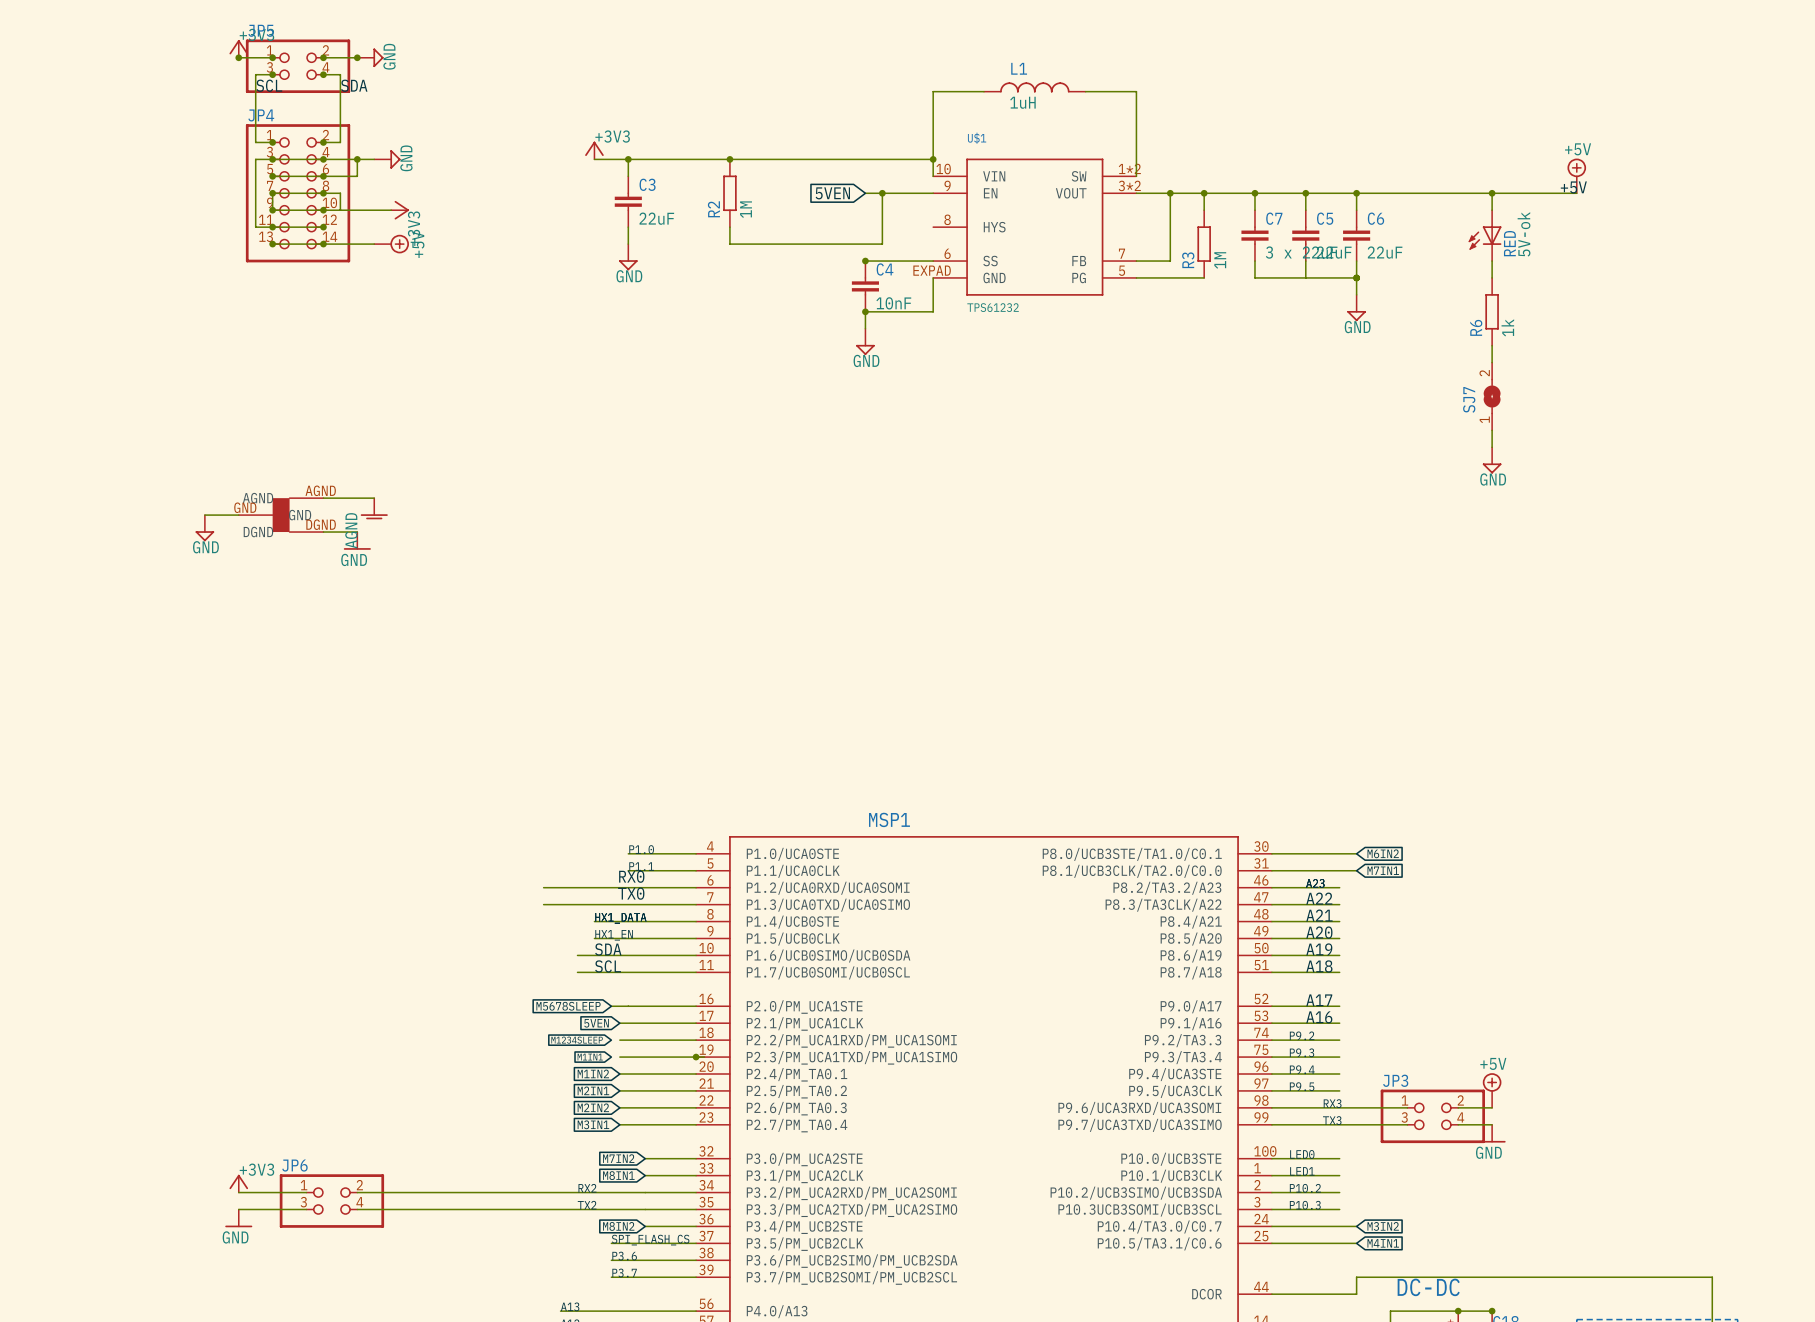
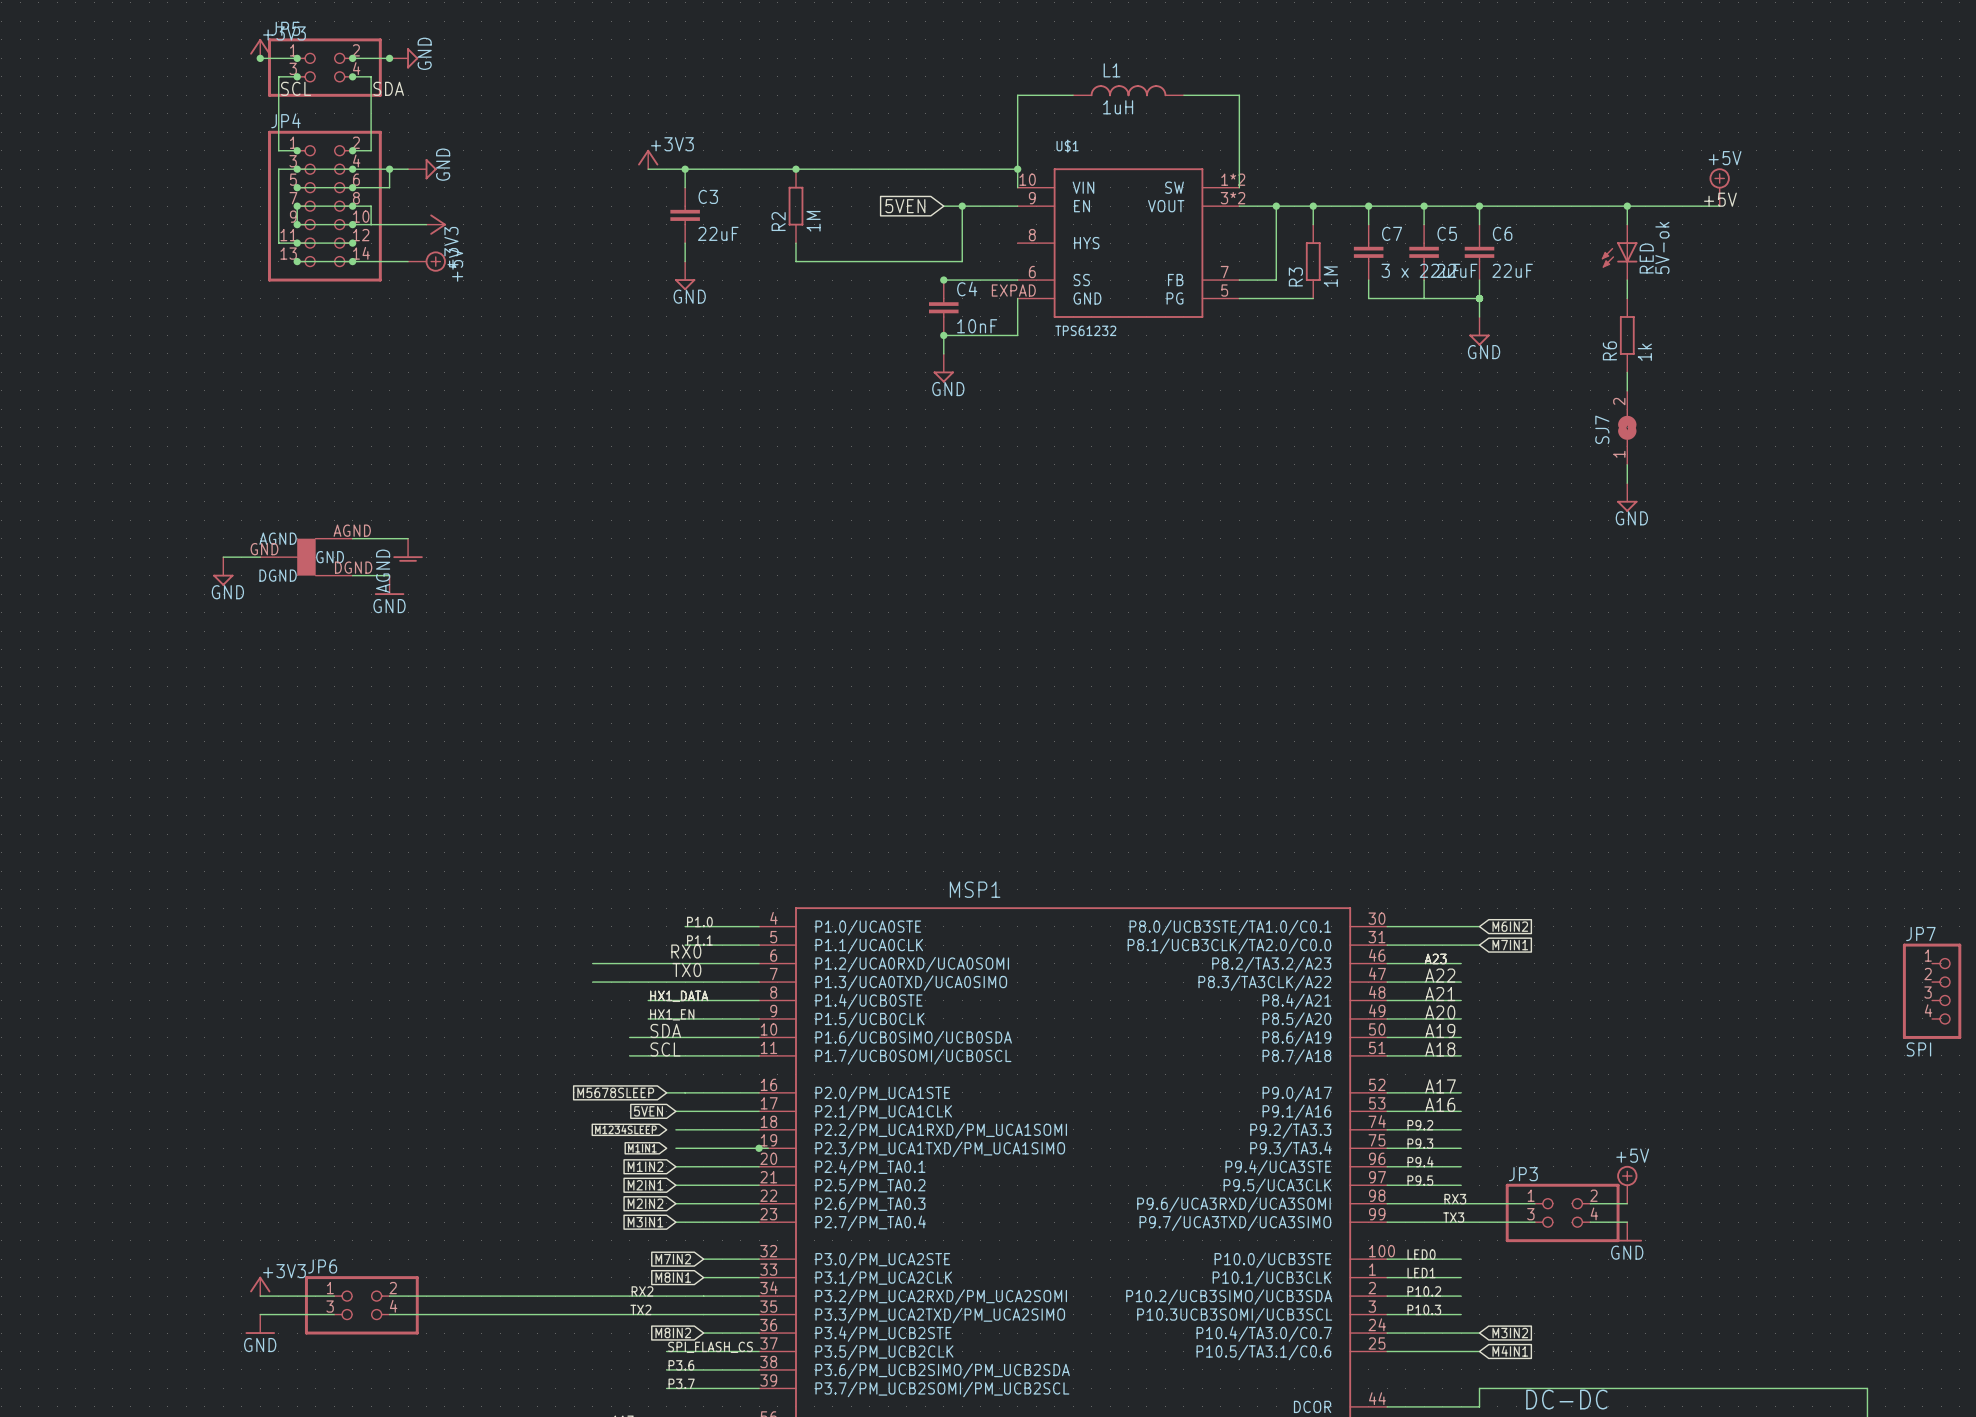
JP7: none -> SPI (1932, 991)

